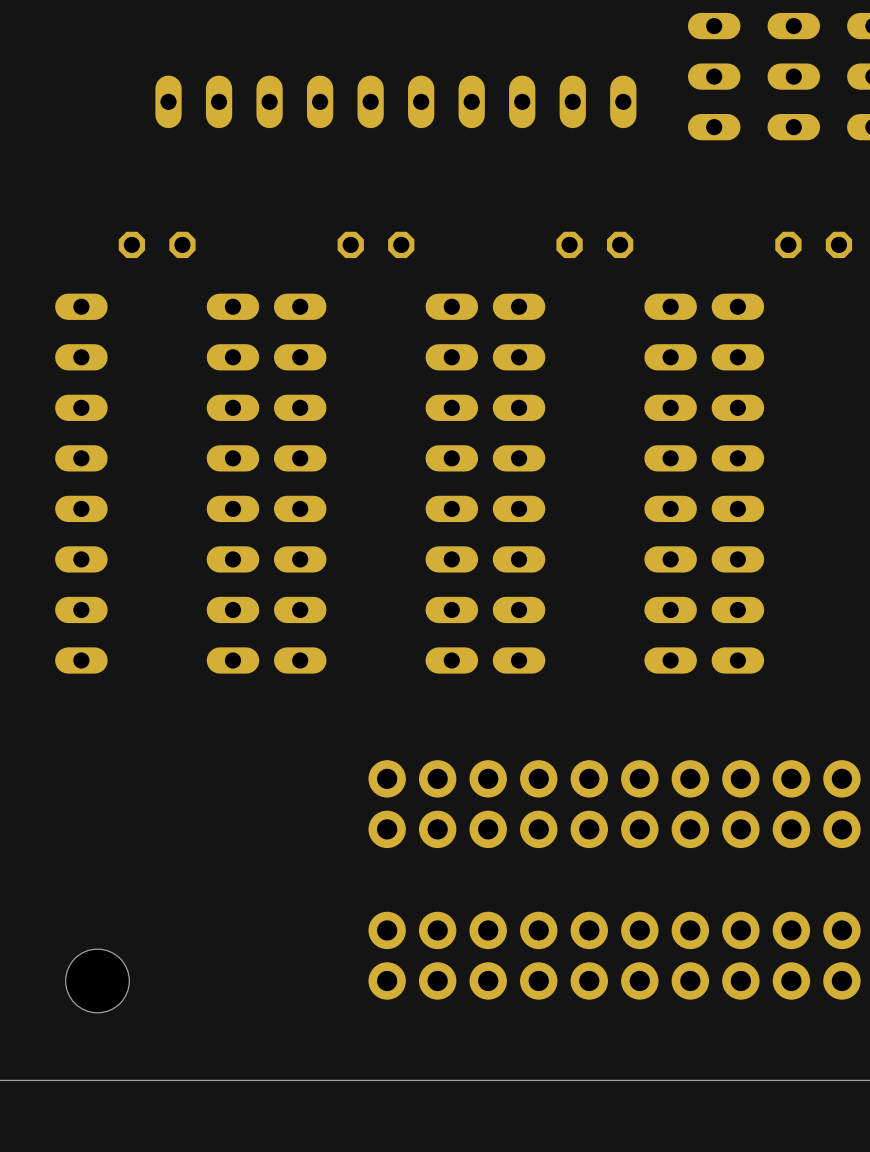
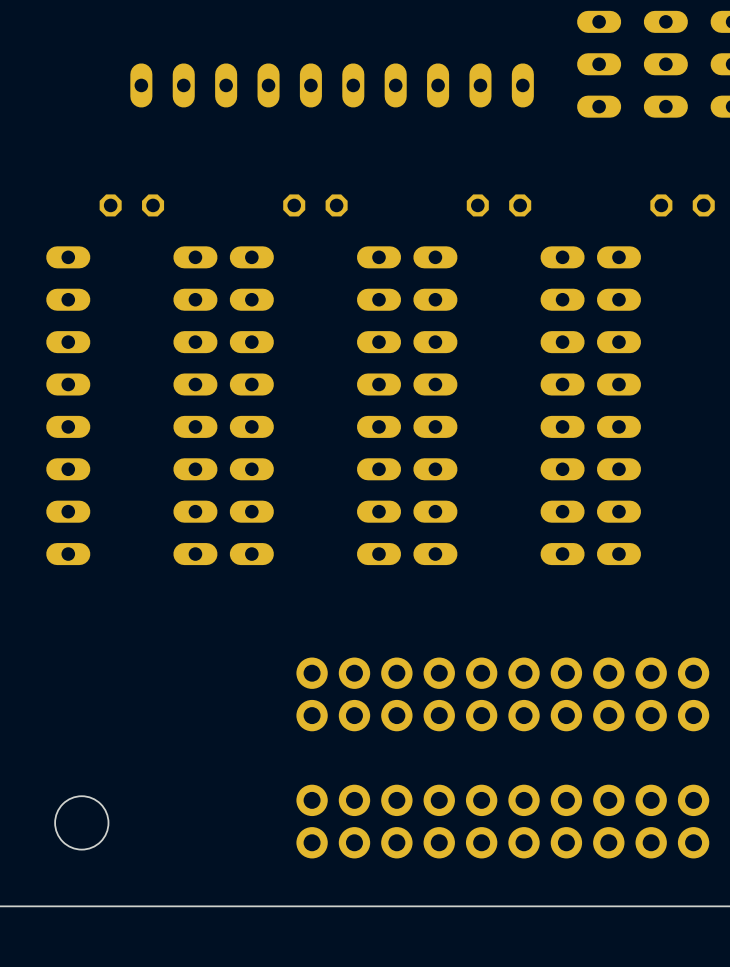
part: (614, 778) -> none
part: none -> (502, 673)
part: (614, 829) -> none
part: none -> (502, 715)
part: (614, 930) -> none
part: none -> (502, 800)
part: (614, 980) -> none
part: none -> (502, 842)

